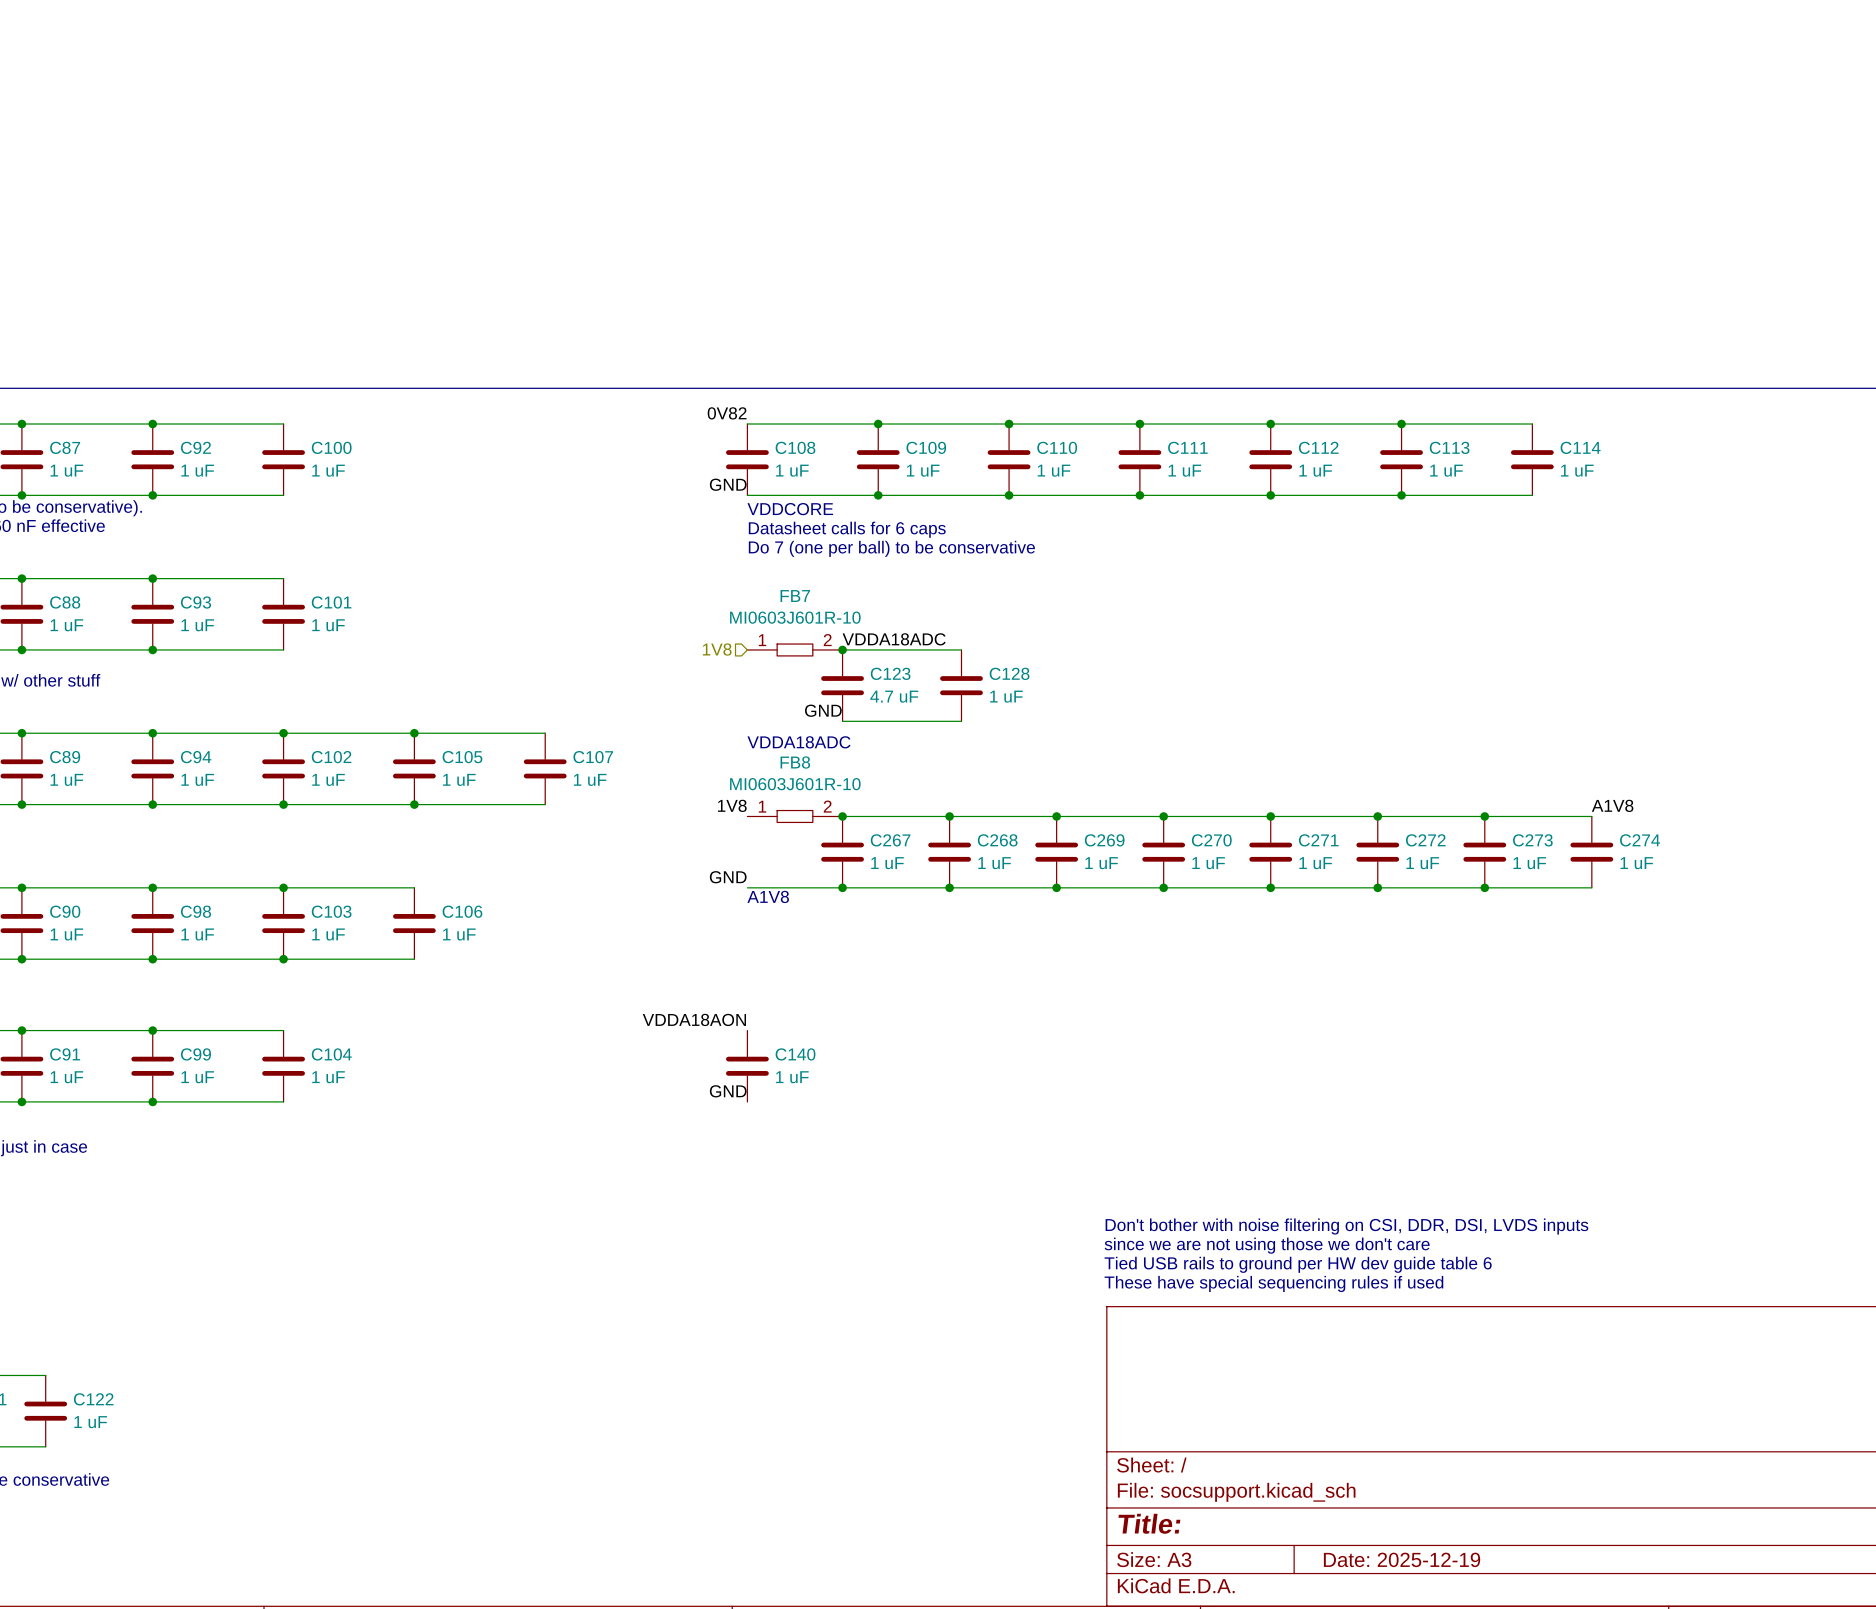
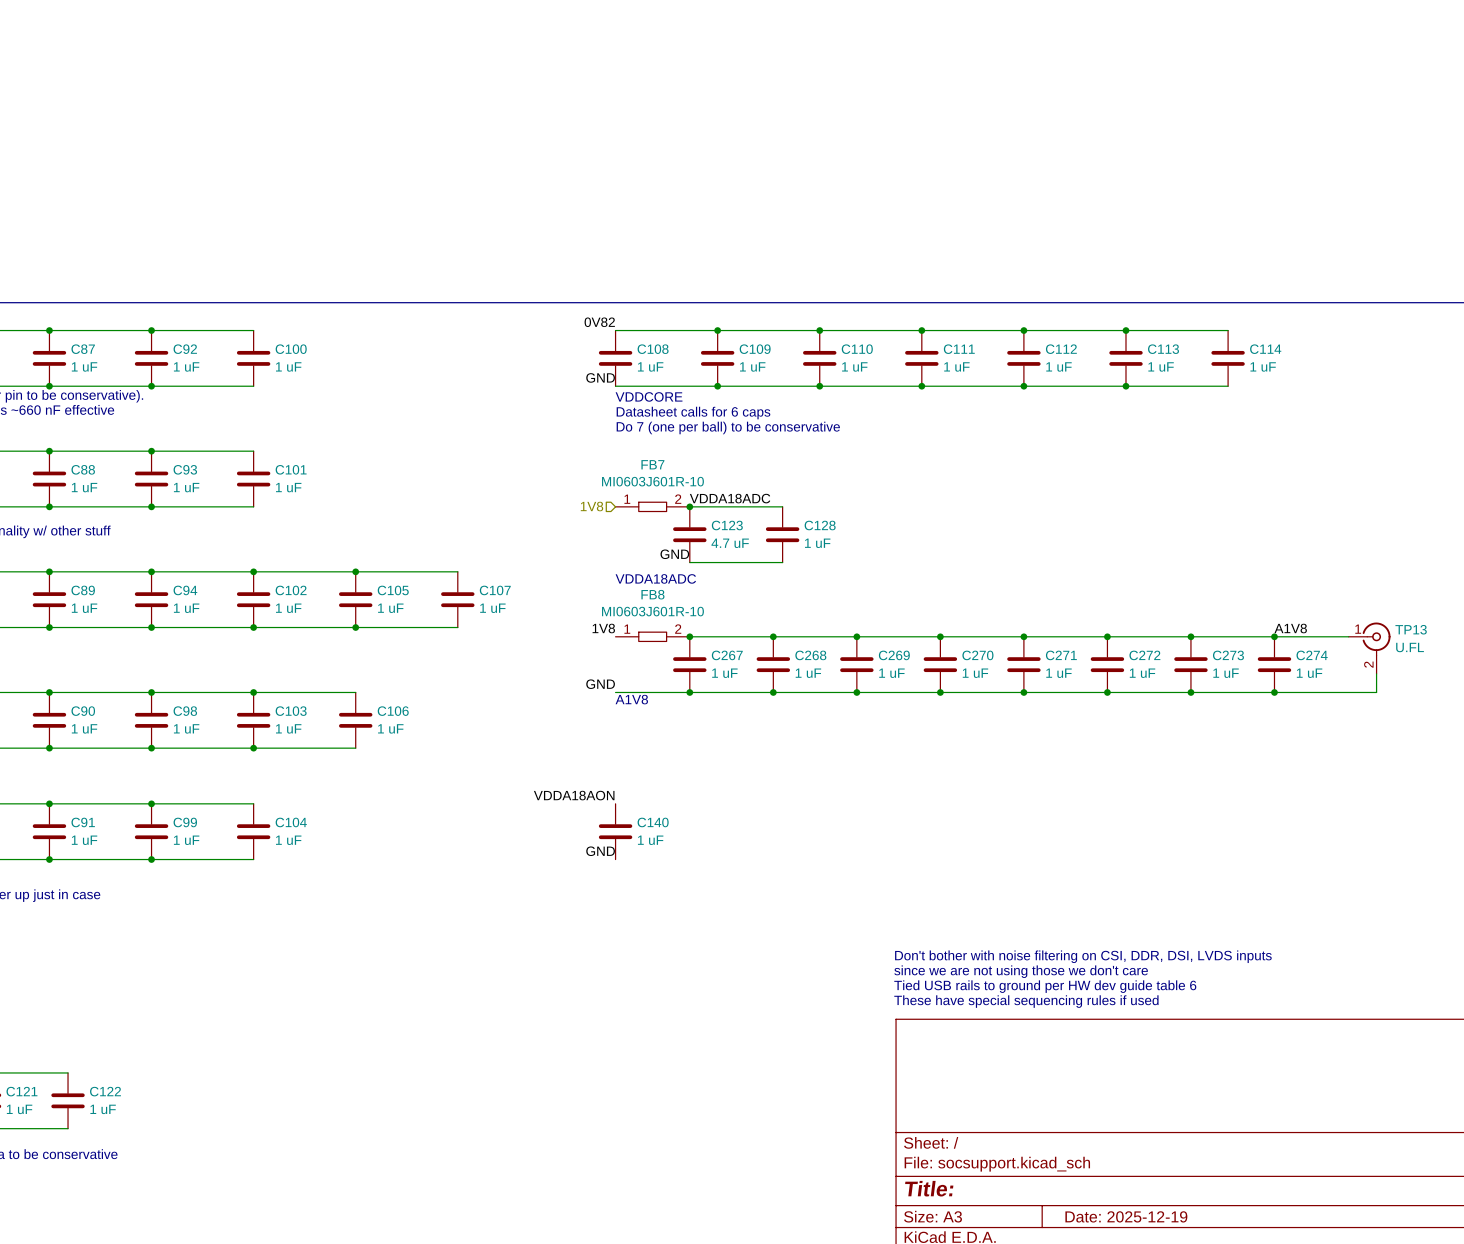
wire: none -> (1274, 636) (1348, 636)
junction: none -> (1274, 636)
TP13: none -> U.FL (1369, 648)
wire: none -> (1376, 673) (1376, 692) (1274, 692)
junction: none -> (1274, 692)

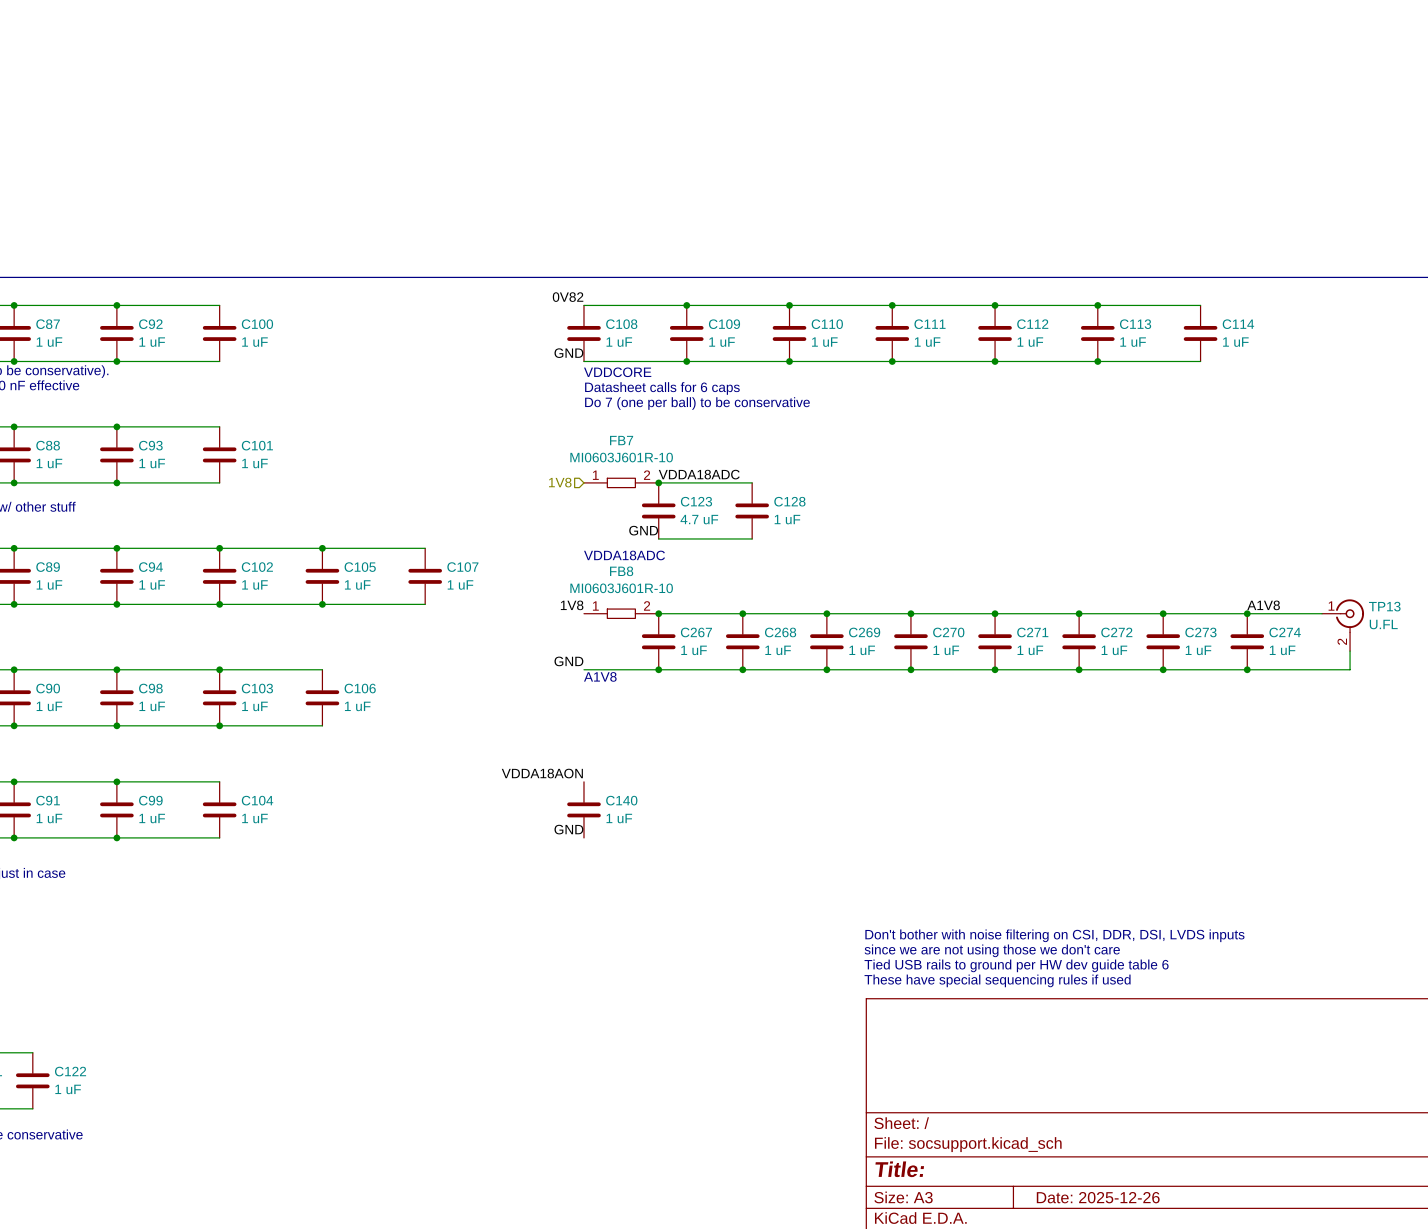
title block: Date: 2025-12-19 (1126, 1216) -> Date: 2025-12-26 (1098, 1197)

